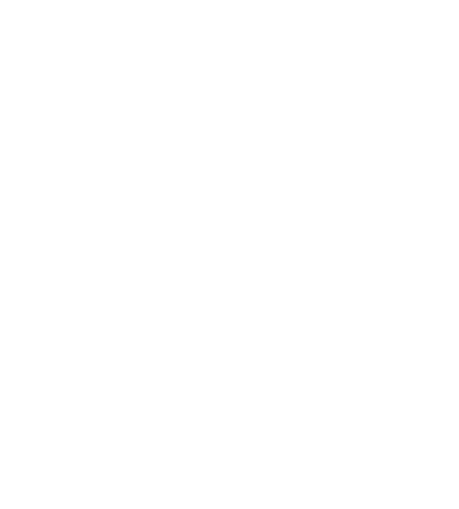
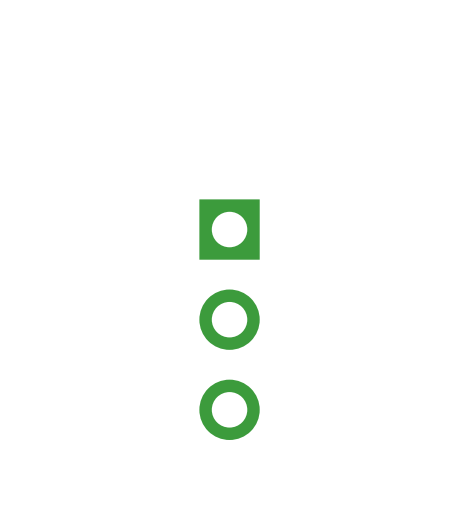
part: none -> (229, 319)

